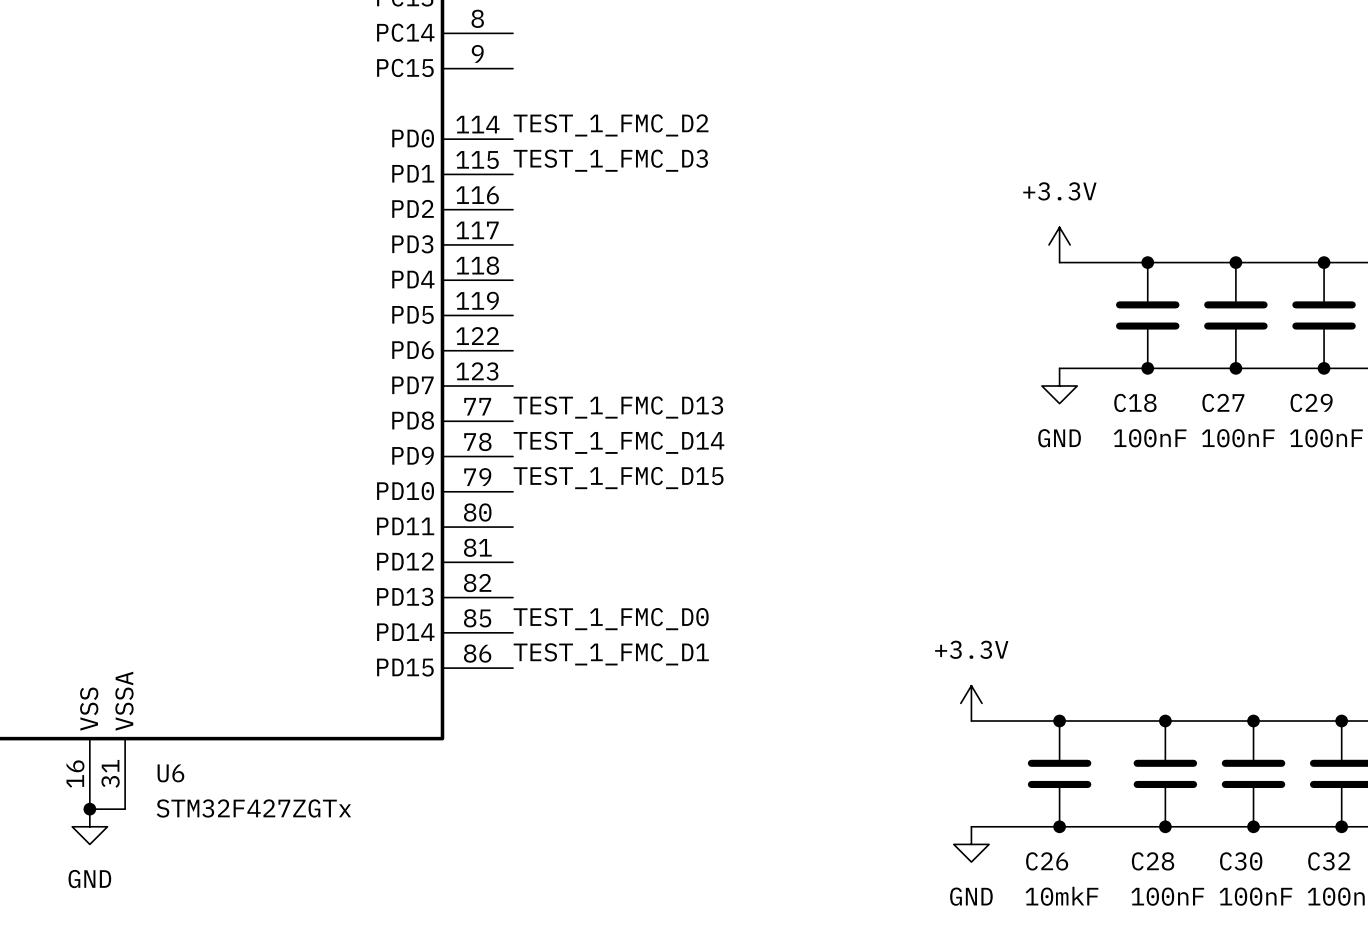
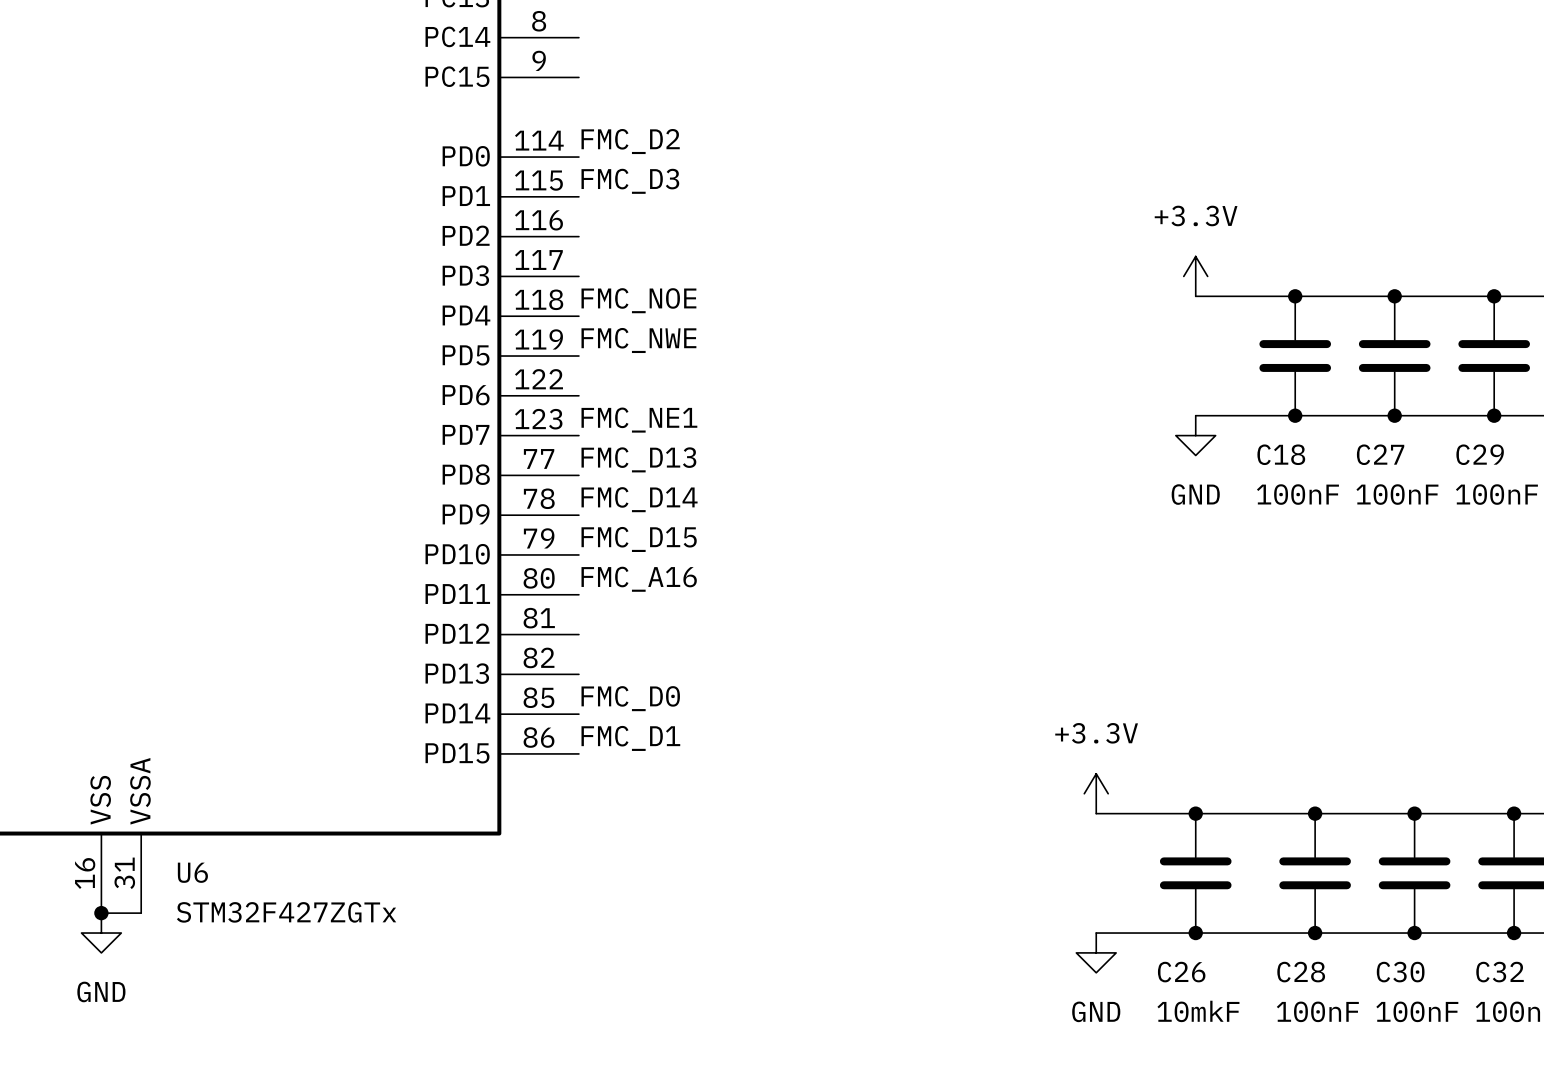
label: TEST_1_FMC_D2 (611, 125) -> FMC_D2 (630, 141)
label: TEST_1_FMC_D3 (610, 160) -> FMC_D3 (630, 181)
label: none -> FMC_NOE (638, 300)
label: none -> FMC_NWE (638, 340)
label: none -> FMC_NE1 (639, 420)
label: TEST_1_FMC_D13 (618, 407) -> FMC_D13 (638, 459)
label: TEST_1_FMC_D14 (618, 442) -> FMC_D14 (639, 499)
label: TEST_1_FMC_D15 (618, 478) -> FMC_D15 (639, 539)
label: none -> FMC_A16 (639, 579)
label: TEST_1_FMC_D0 (611, 619) -> FMC_D0 (630, 698)
label: TEST_1_FMC_D1 (611, 654) -> FMC_D1 (630, 738)

